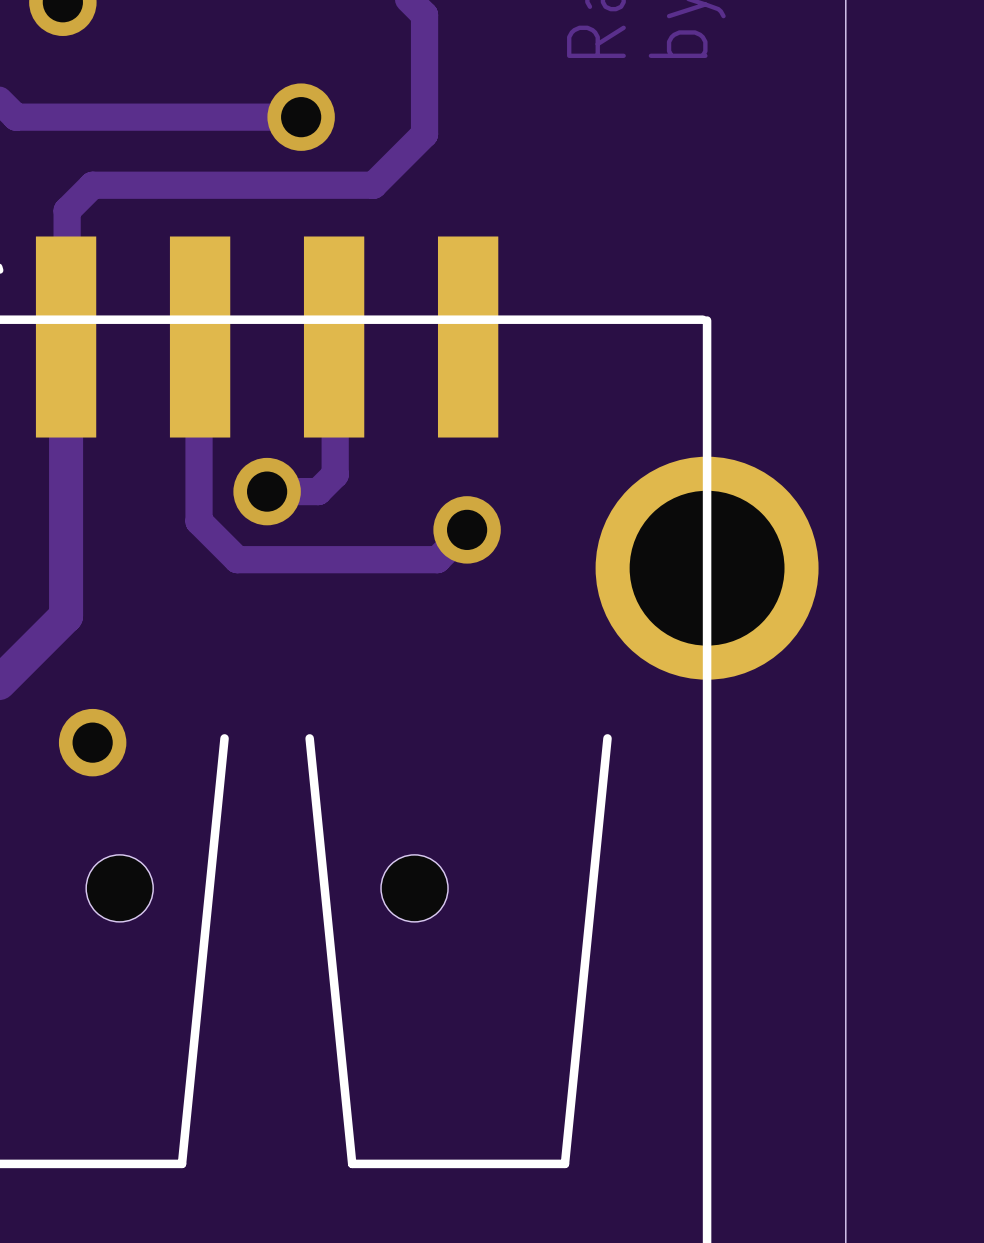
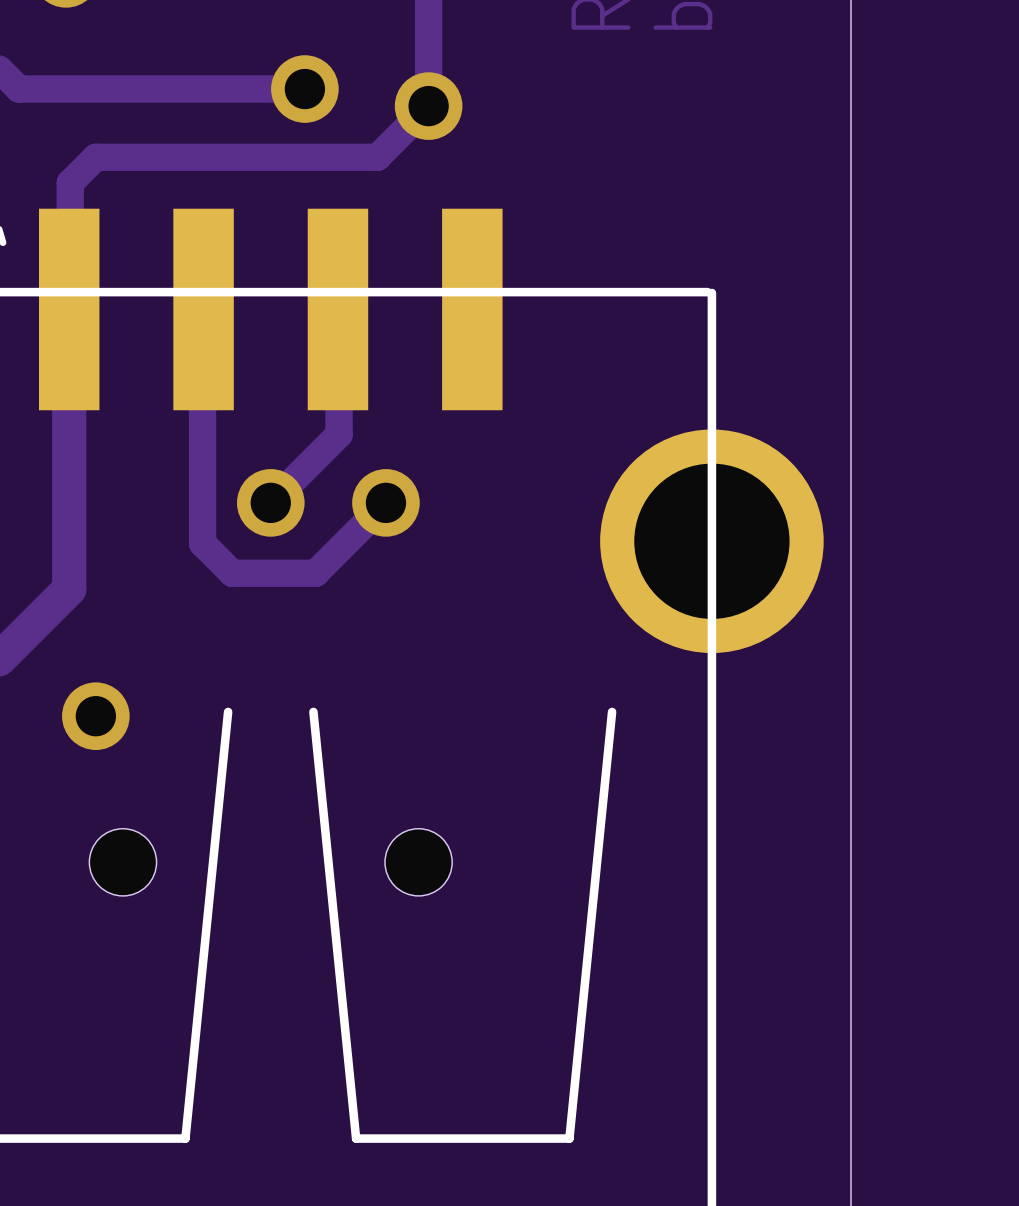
via: none -> (428, 106)
track: (335, 461) (335, 474) (318, 491) (267, 491) -> (339, 434) (270, 502)
via position: (267, 491) -> (270, 502)
track: (199, 521) (237, 559) (437, 559) (467, 529) -> (202, 494) (202, 543) (232, 573) (315, 573) (385, 502)
via: none -> (385, 502)
via: (467, 529) -> none

